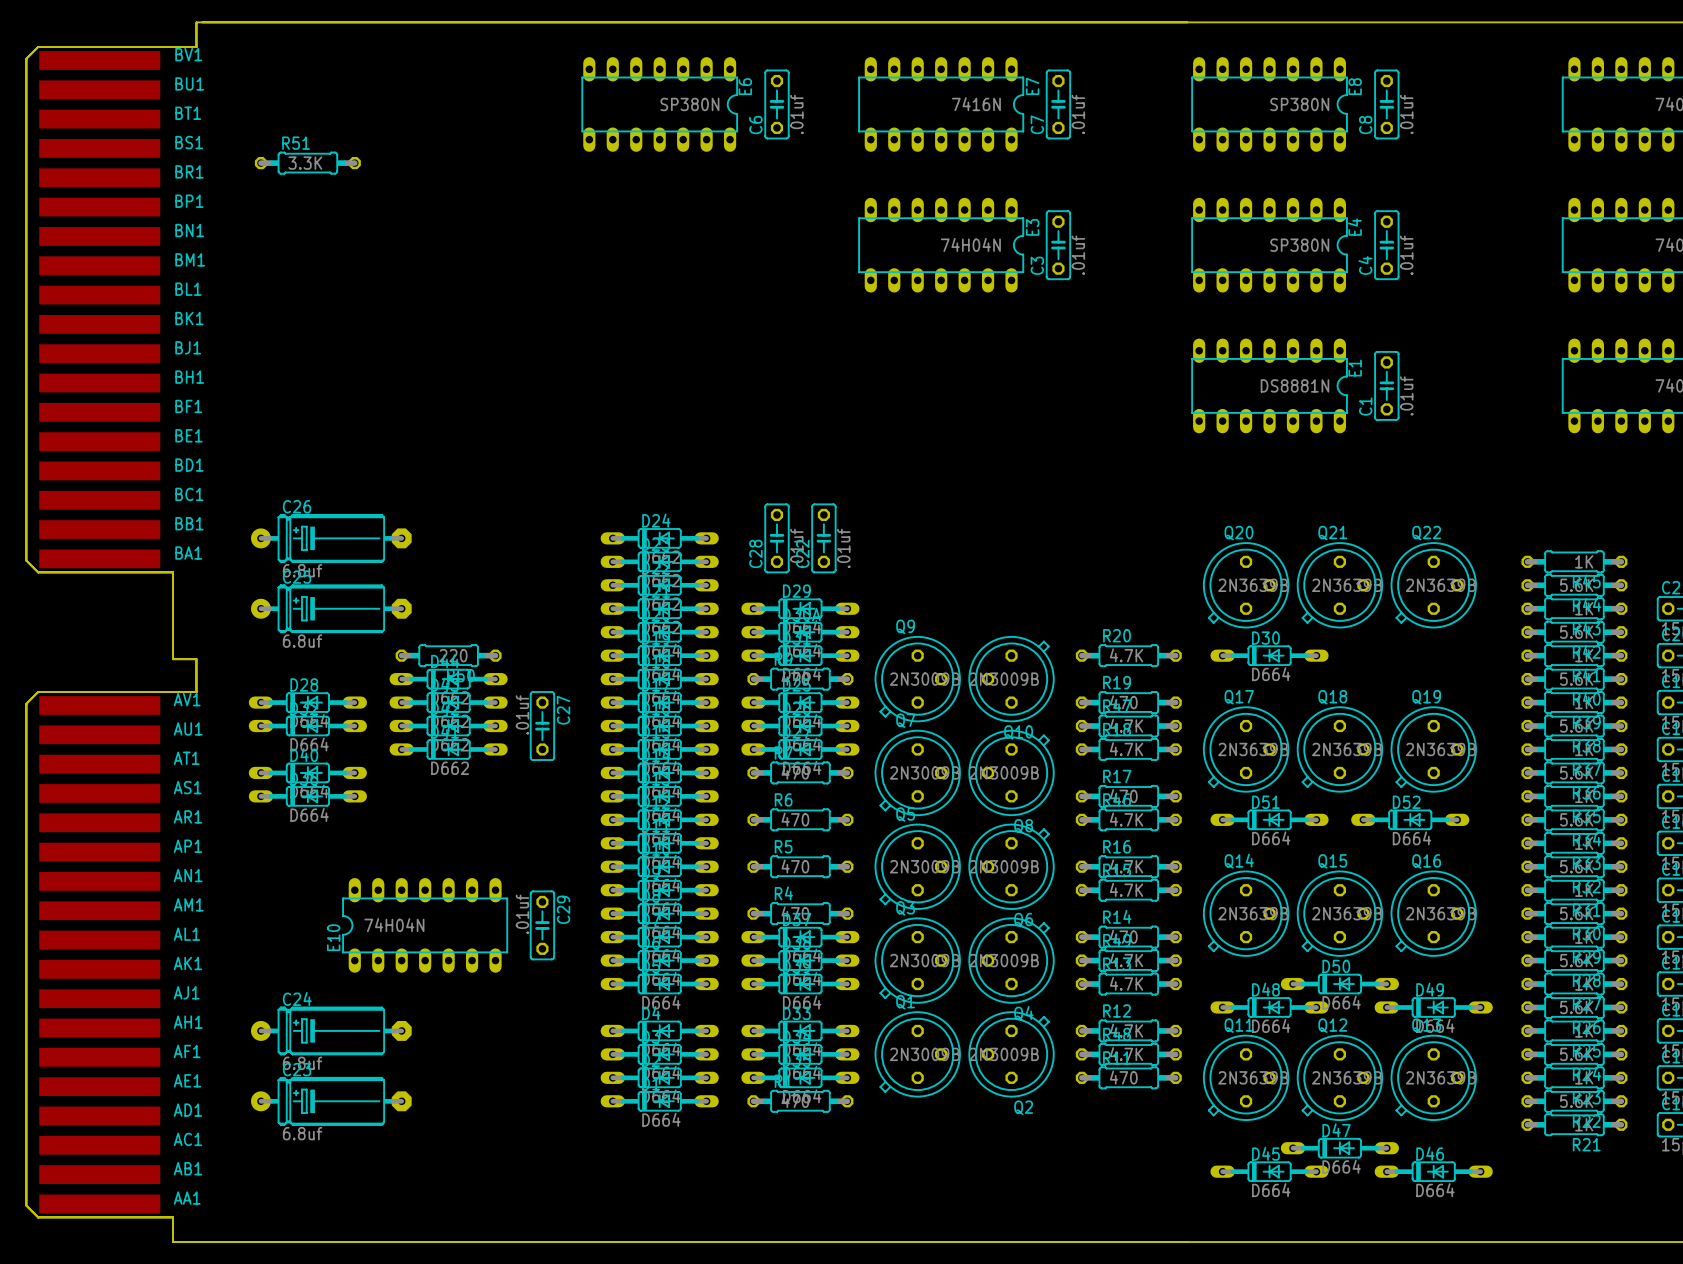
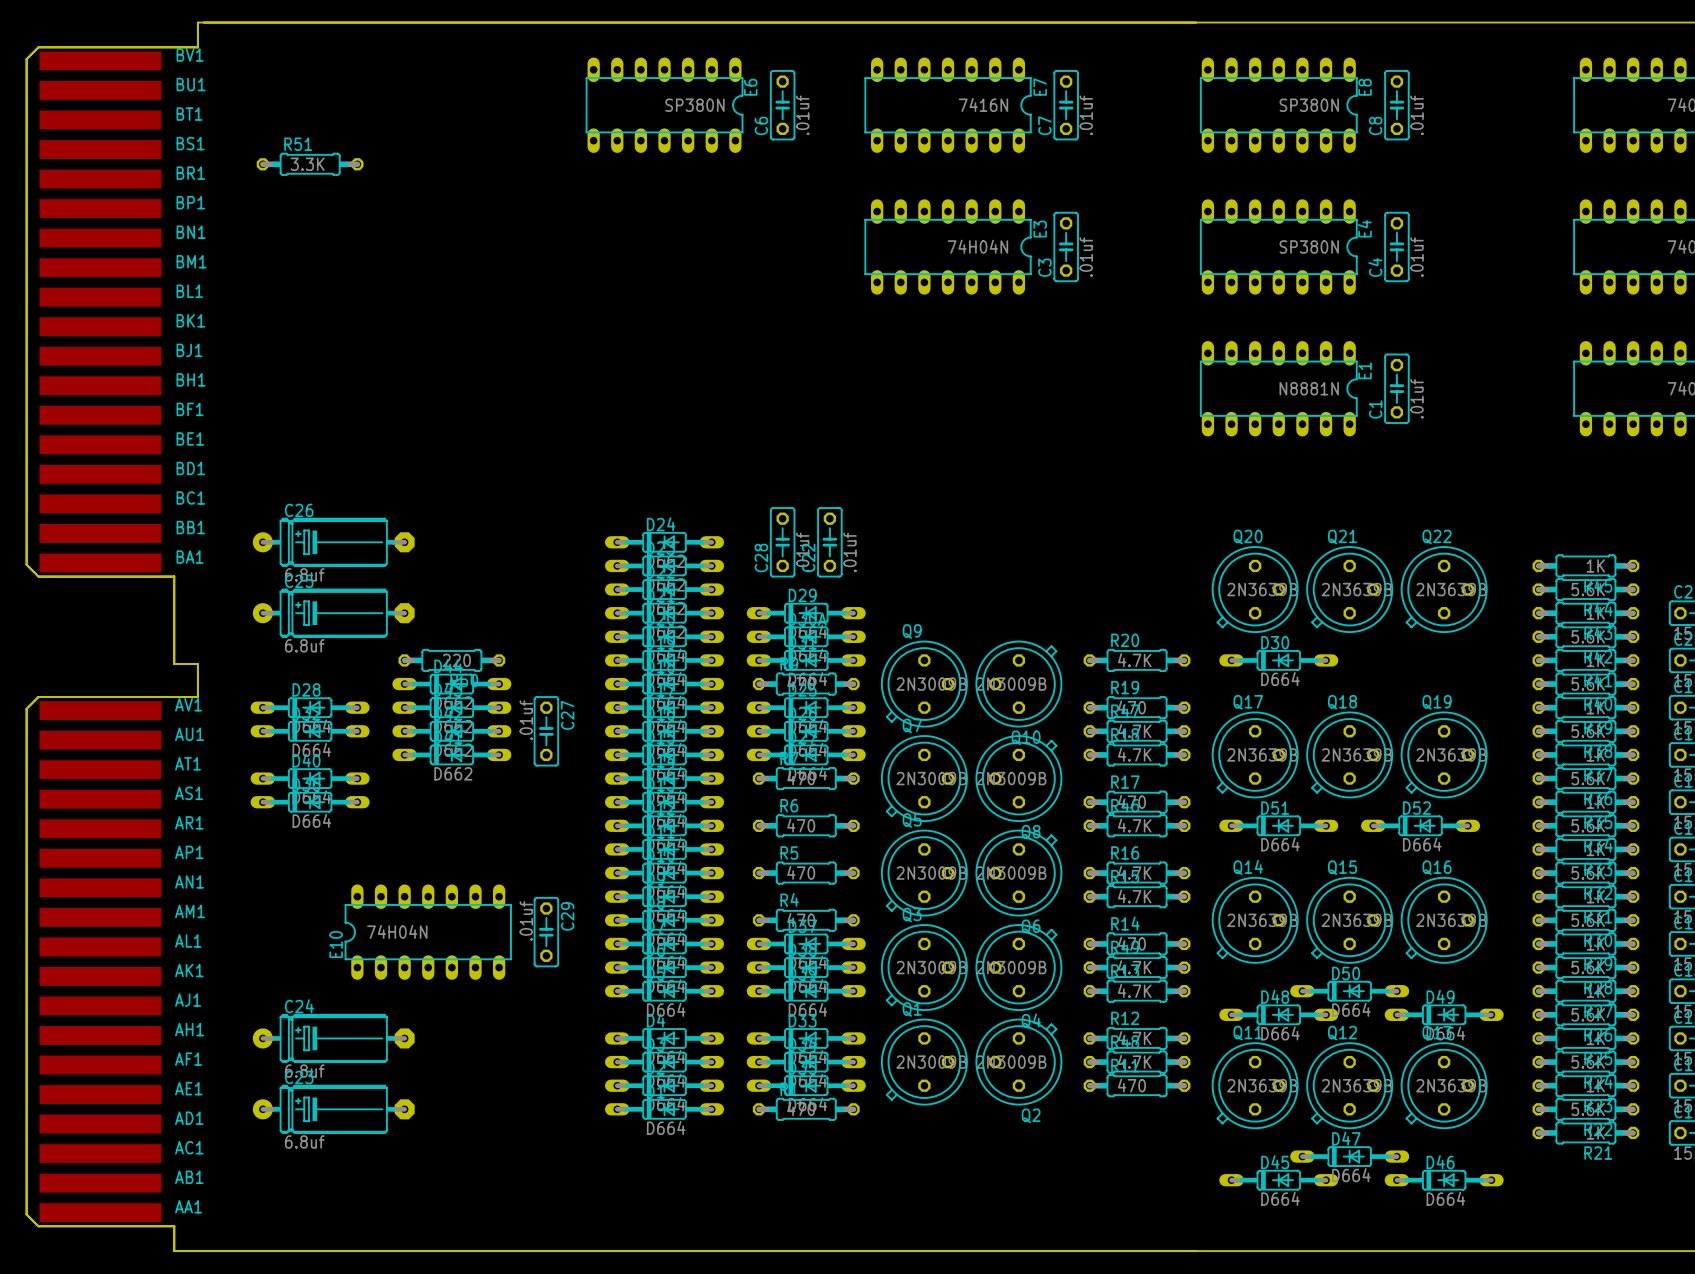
E1 value: DS8881N (1294, 385) -> N8881N (1309, 388)

